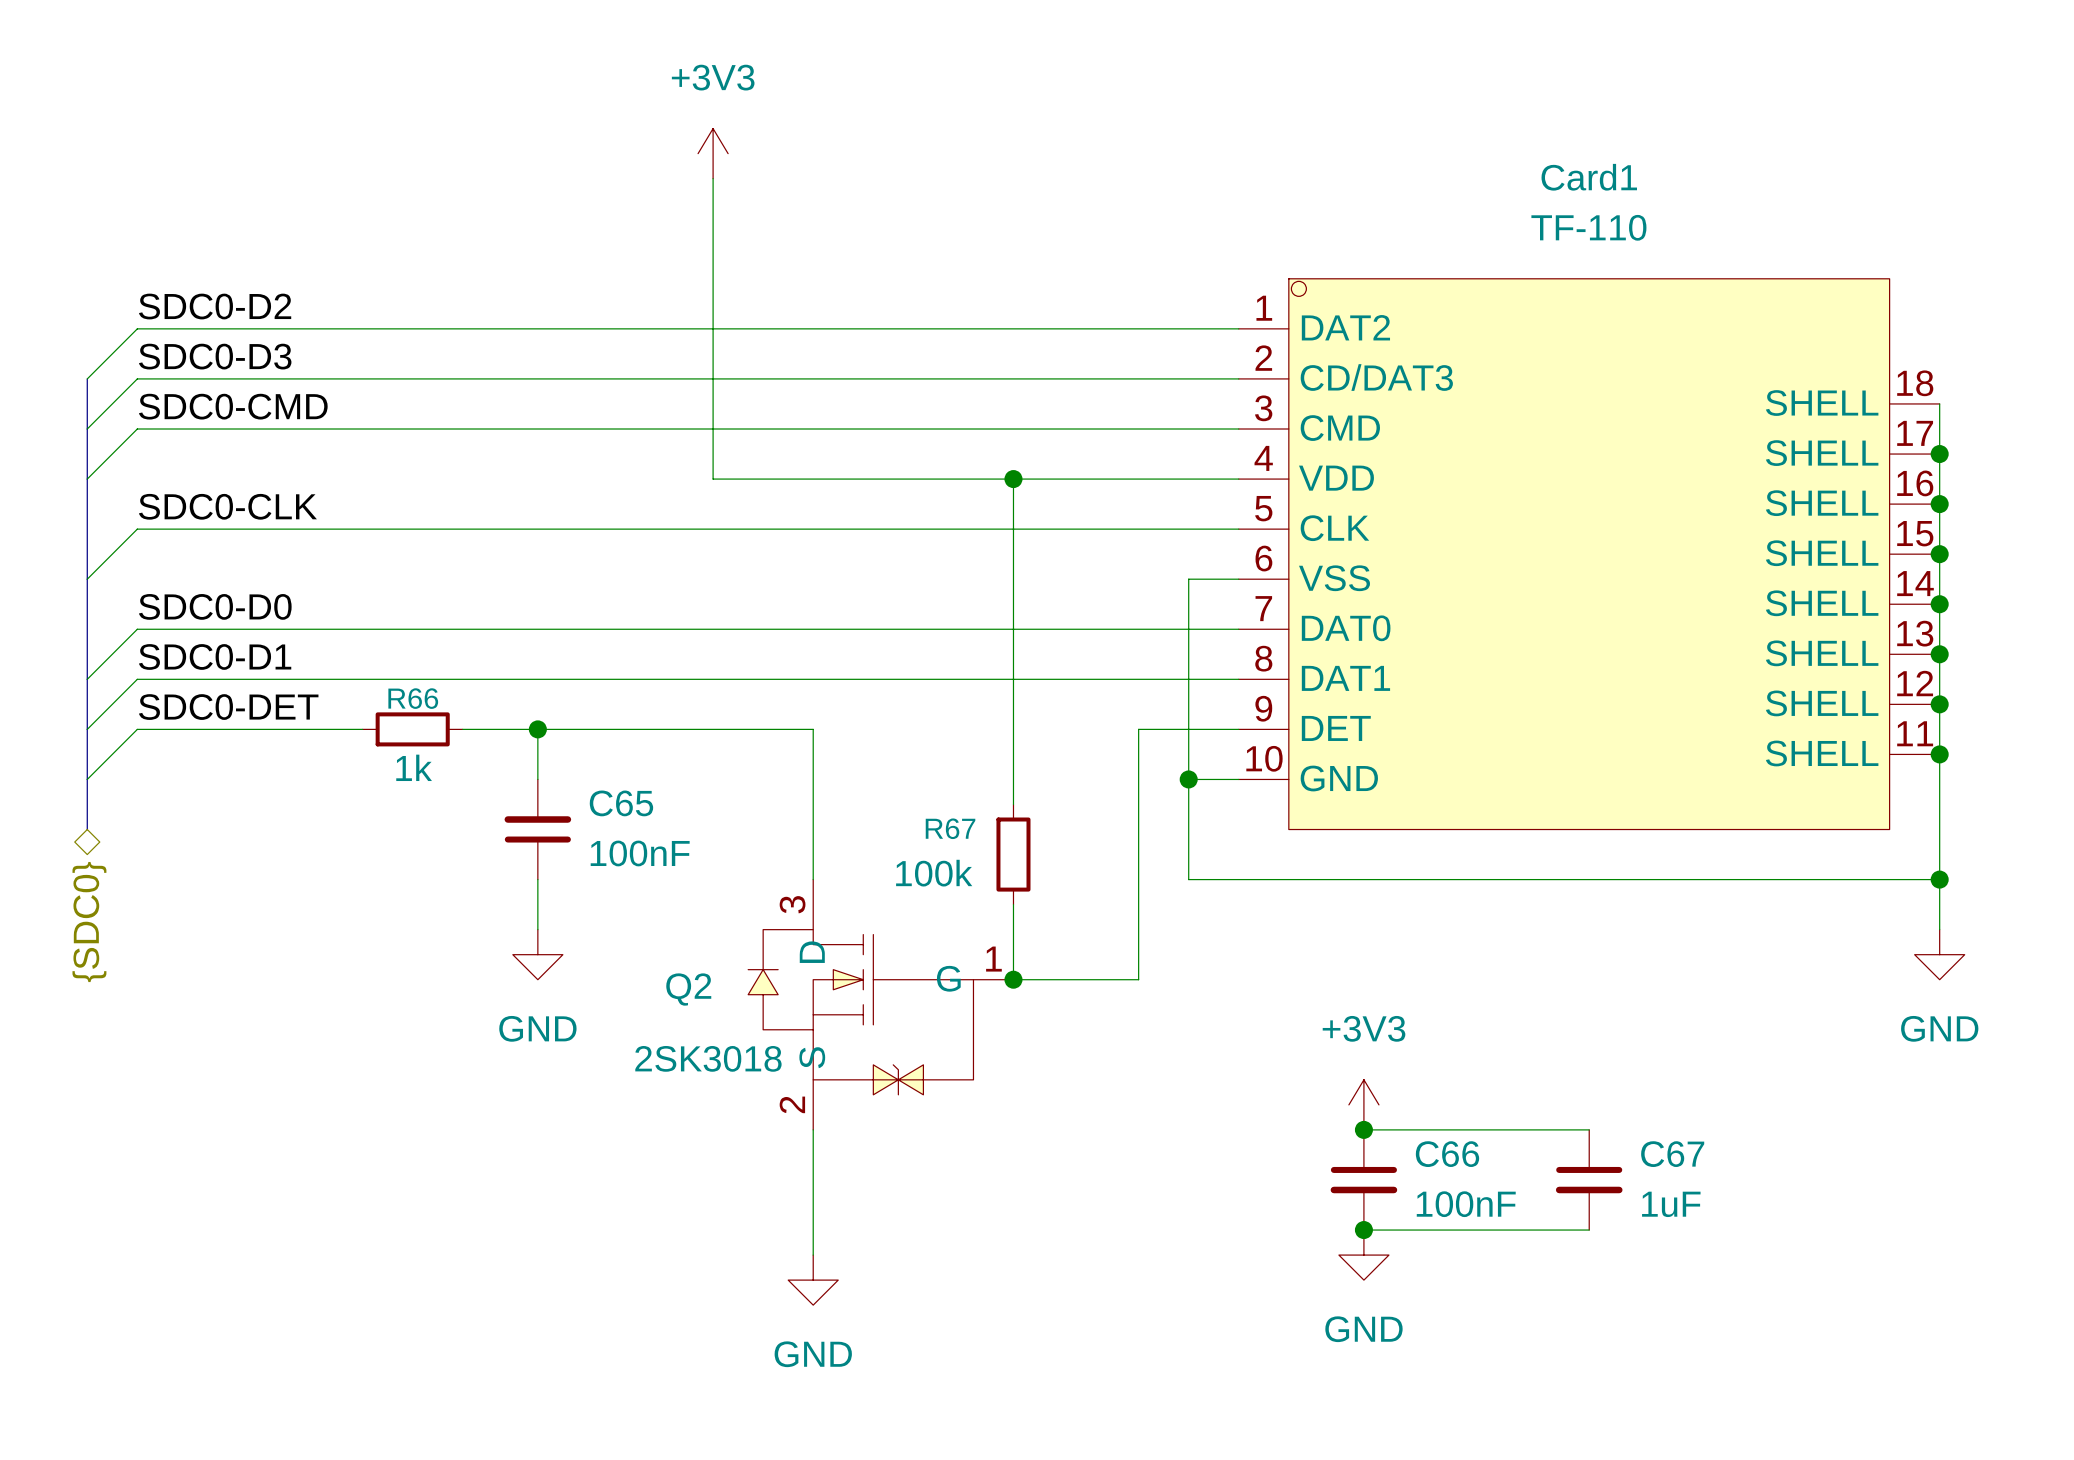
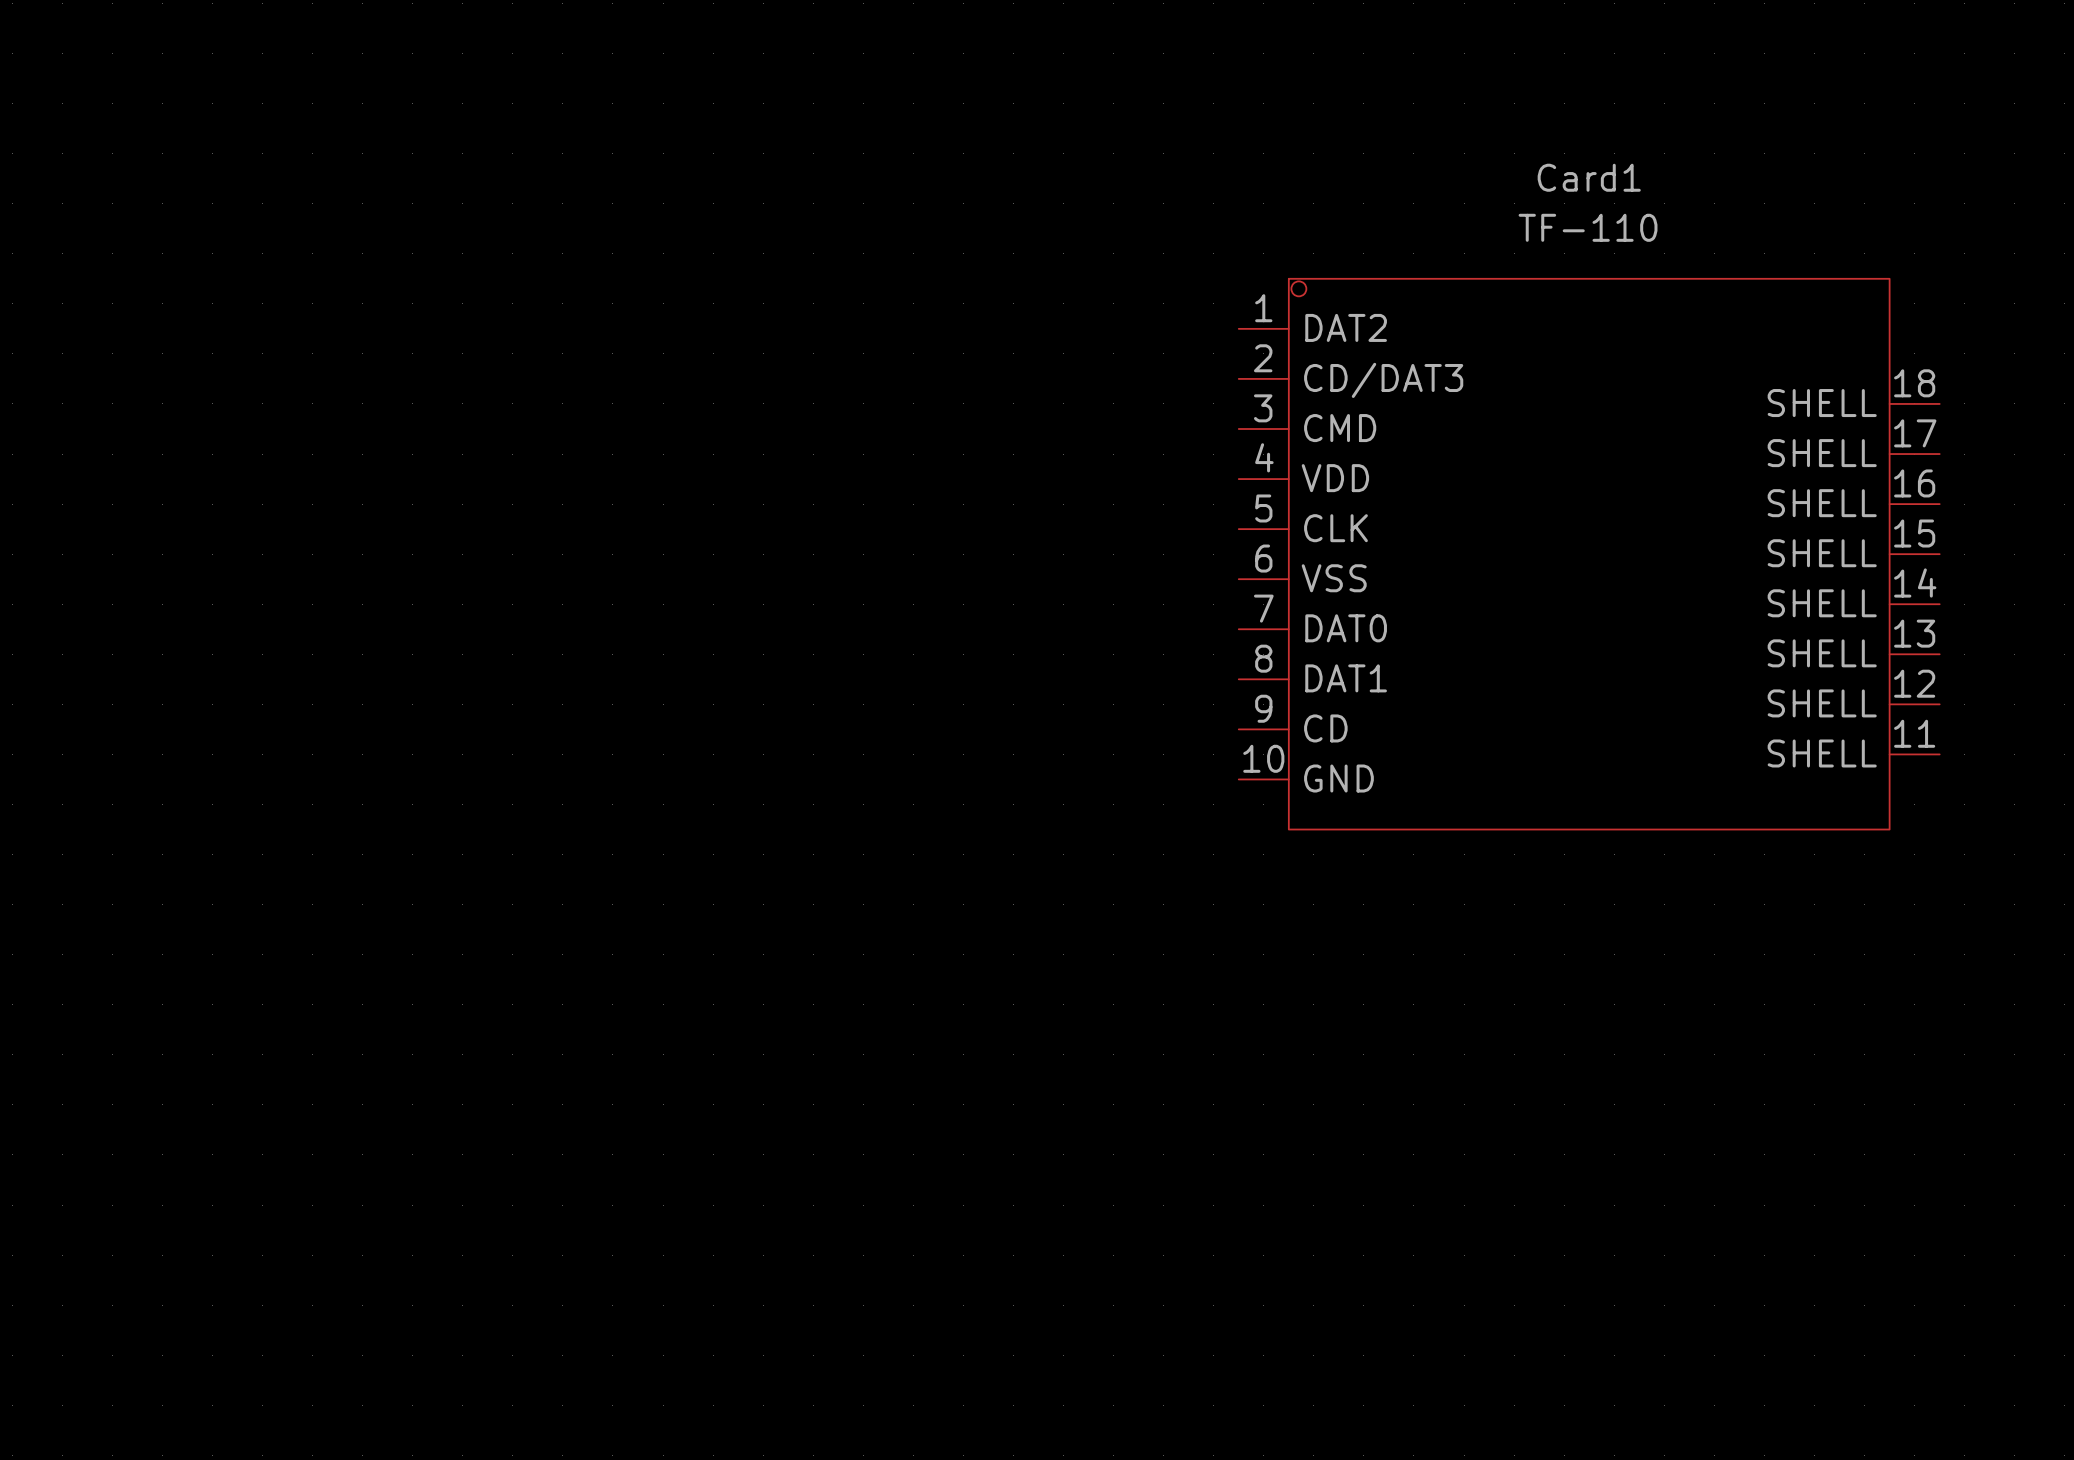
power symbol: +3V3 (713, 153) -> none
wire: (713, 178) (713, 479) (1238, 479) -> none
label: SDC0-D2 (215, 306) -> none
wire: (1238, 328) (137, 328) (87, 378) -> none
label: SDC0-D3 (215, 356) -> none
bus: (87, 378) (87, 829) -> none
wire: (1238, 378) (137, 378) (87, 429) -> none
wire: (1939, 403) (1939, 929) -> none
label: SDC0-CMD (233, 406) -> none
wire: (1238, 429) (137, 429) (87, 479) -> none
junction: (1939, 454) -> none
wire: (1013, 479) (1013, 804) -> none
junction: (1013, 479) -> none
junction: (1939, 504) -> none
label: SDC0-CLK (227, 506) -> none
wire: (1238, 529) (137, 529) (87, 579) -> none
junction: (1939, 554) -> none
wire: (1238, 579) (1188, 579) (1188, 879) (1939, 879) -> none
junction: (1939, 604) -> none
label: SDC0-D0 (215, 606) -> none
wire: (1238, 629) (137, 629) (87, 679) -> none
junction: (1939, 654) -> none
label: SDC0-D1 (215, 656) -> none
wire: (1238, 679) (137, 679) (87, 729) -> none
junction: (1939, 704) -> none
label: SDC0-DET (228, 707) -> none
Card1 pin name: DET (1336, 728) -> CD (1325, 728)
wire: (362, 729) (137, 729) (87, 779) -> none
R66: 1k (412, 729) -> none
wire: (462, 729) (813, 729) (813, 879) -> none
wire: (537, 729) (537, 779) -> none
junction: (537, 729) -> none
wire: (1238, 729) (1138, 729) (1138, 979) (1013, 979) (1013, 904) -> none
junction: (1939, 754) -> none
wire: (1188, 779) (1238, 779) -> none
junction: (1188, 779) -> none
C65: 100nF (537, 829) -> none
R67: 100k (1013, 854) -> none
wire: (537, 879) (537, 929) -> none
junction: (1939, 879) -> none
hierarchical label: {SDC0} (89, 922) -> none
power symbol: GND (537, 954) -> none
power symbol: GND (1939, 954) -> none
junction: (1013, 979) -> none
Q2: 2SK3018 (880, 1004) -> none
power symbol: +3V3 (1363, 1104) -> none
wire: (813, 1129) (813, 1255) -> none
wire: (1363, 1129) (1589, 1129) -> none
junction: (1363, 1129) -> none
C66: 100nF (1363, 1179) -> none
C67: 1uF (1589, 1179) -> none
wire: (1363, 1230) (1589, 1230) -> none
junction: (1363, 1230) -> none
power symbol: GND (1363, 1255) -> none
power symbol: GND (813, 1280) -> none

